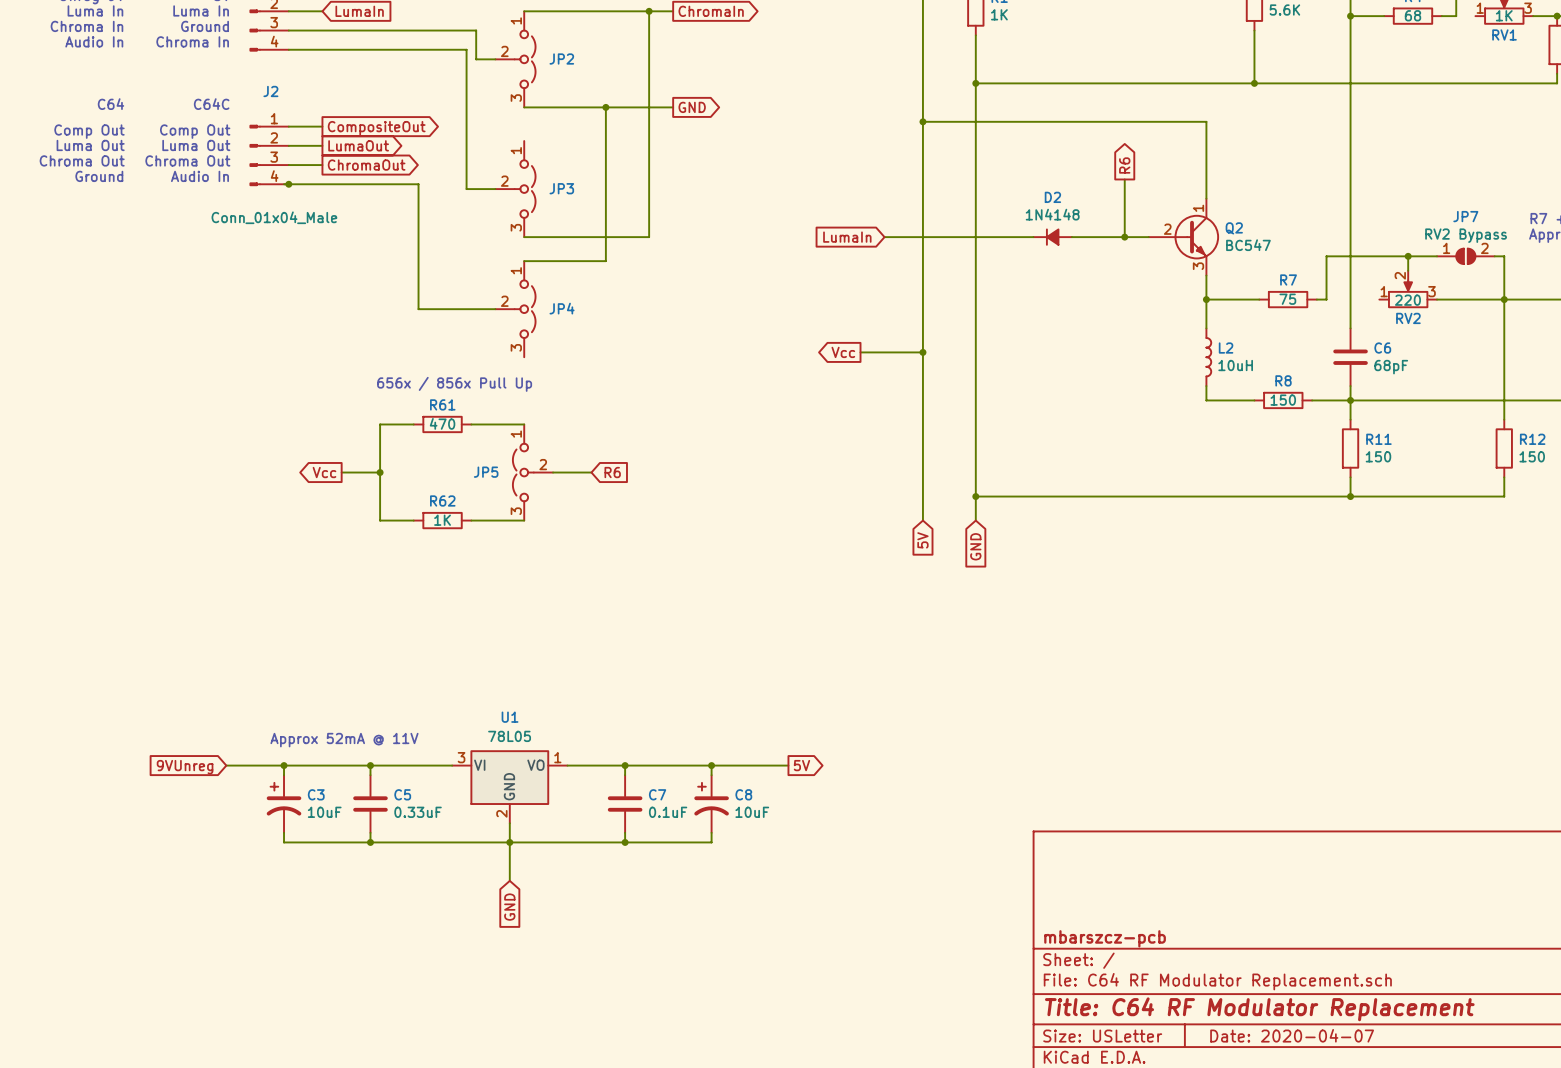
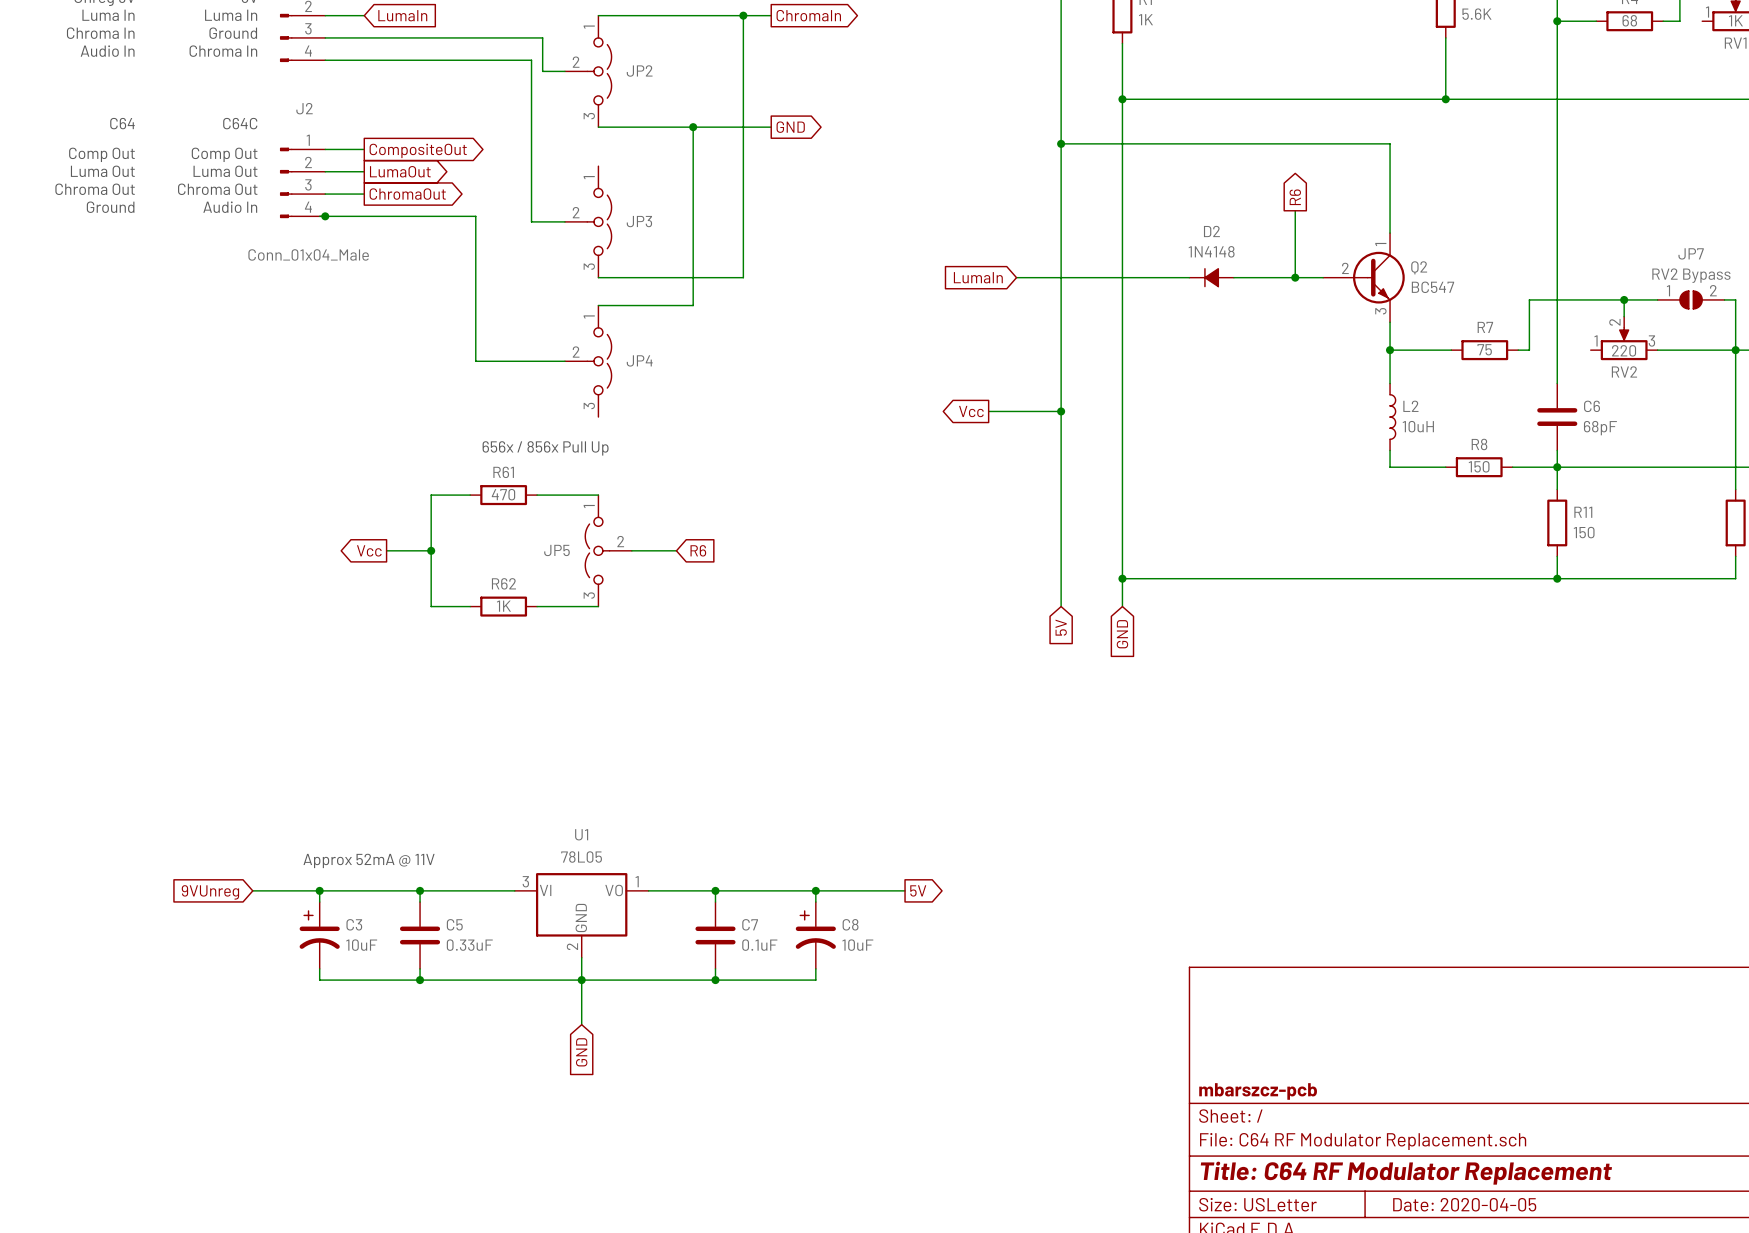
title block: Date: 2020-04-07 (1292, 1035) -> Date: 2020-04-05 (1464, 1204)

